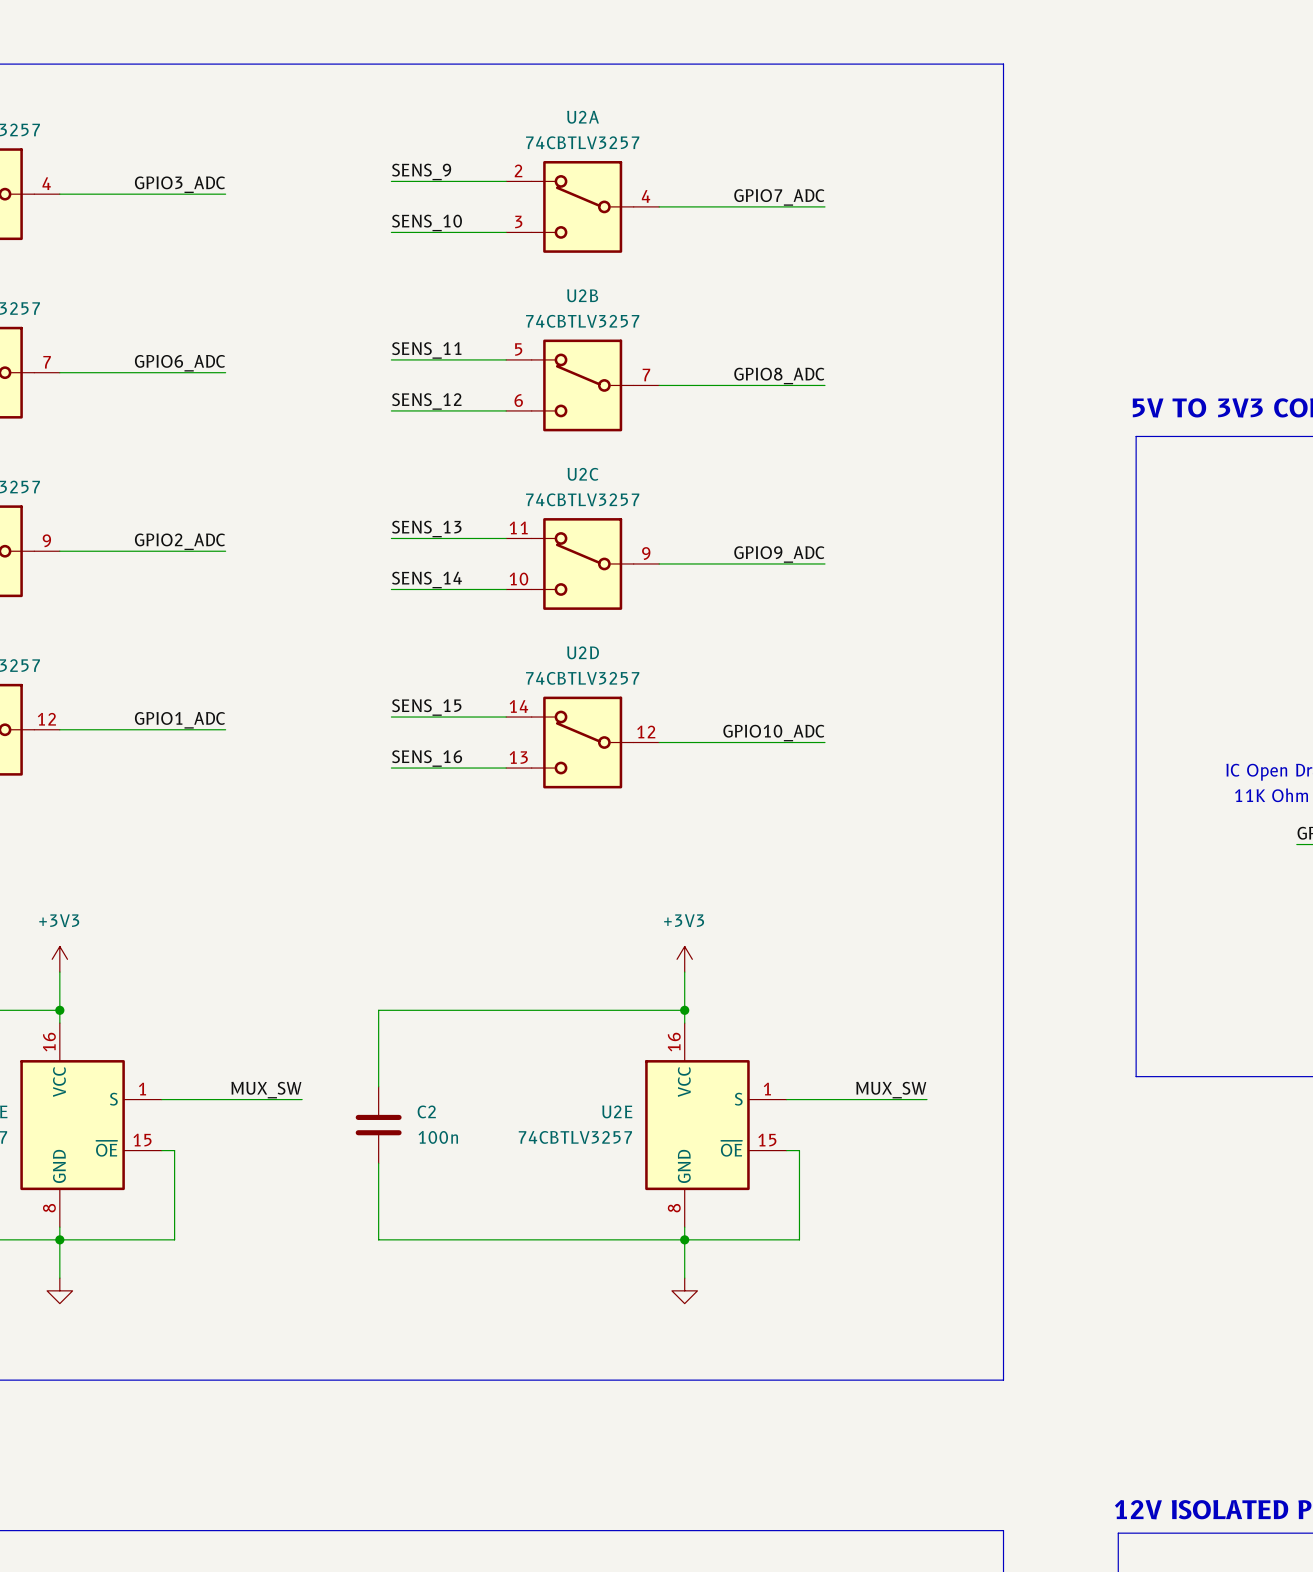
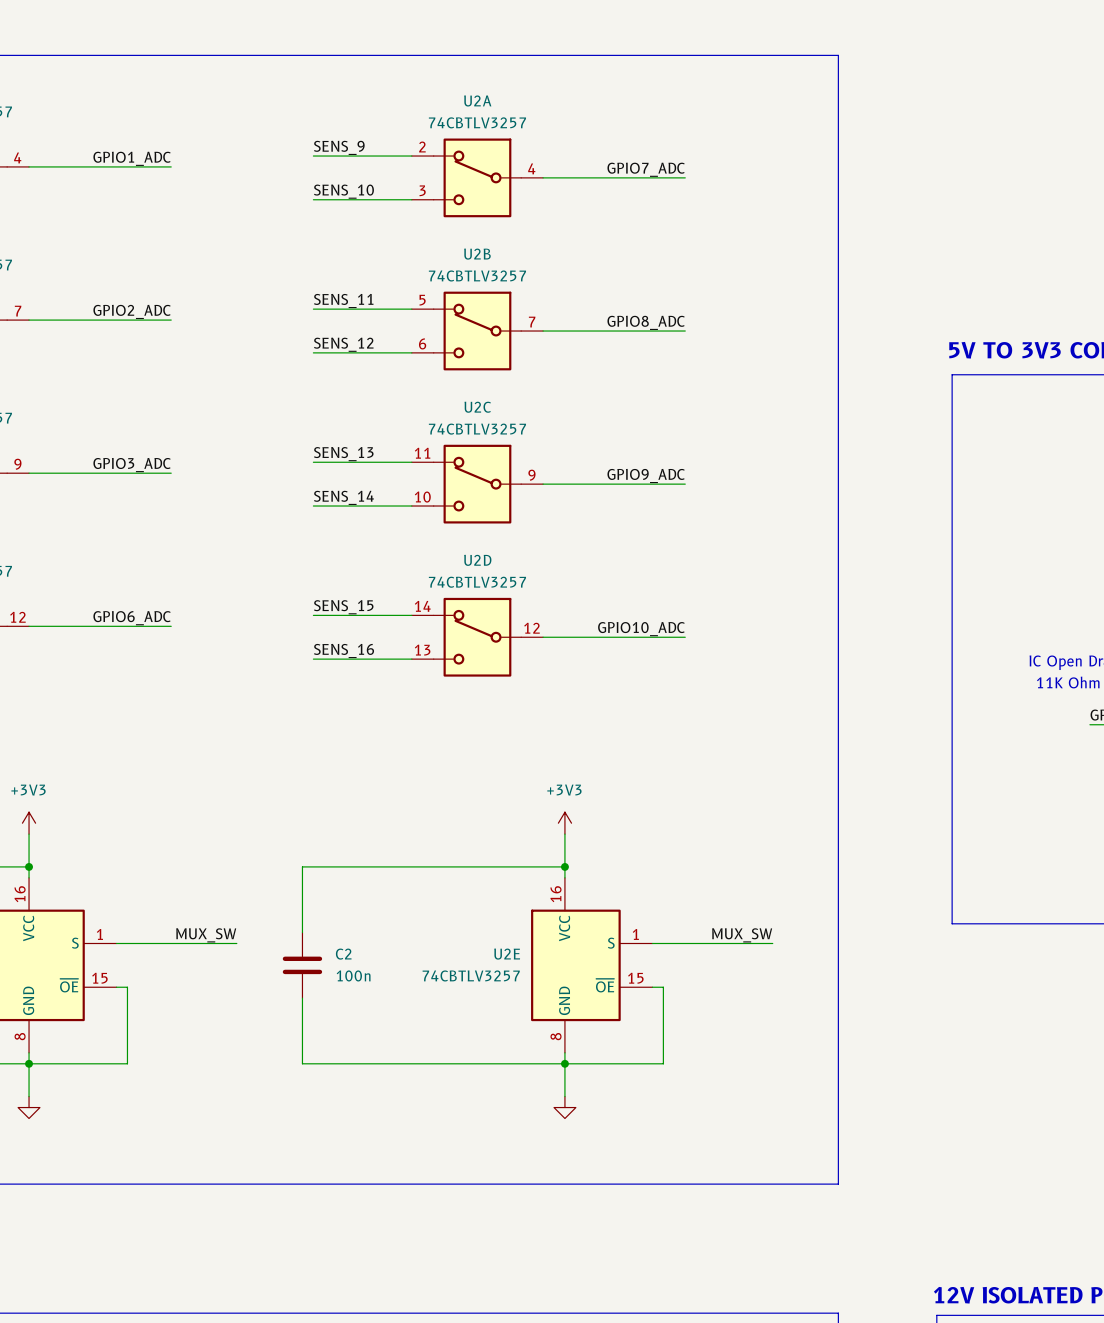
label: GPIO3_ADC (179, 184) -> GPIO1_ADC (132, 158)
label: GPIO6_ADC (179, 363) -> GPIO2_ADC (132, 311)
label: GPIO2_ADC (179, 541) -> GPIO3_ADC (132, 465)
label: GPIO1_ADC (179, 720) -> GPIO6_ADC (132, 618)

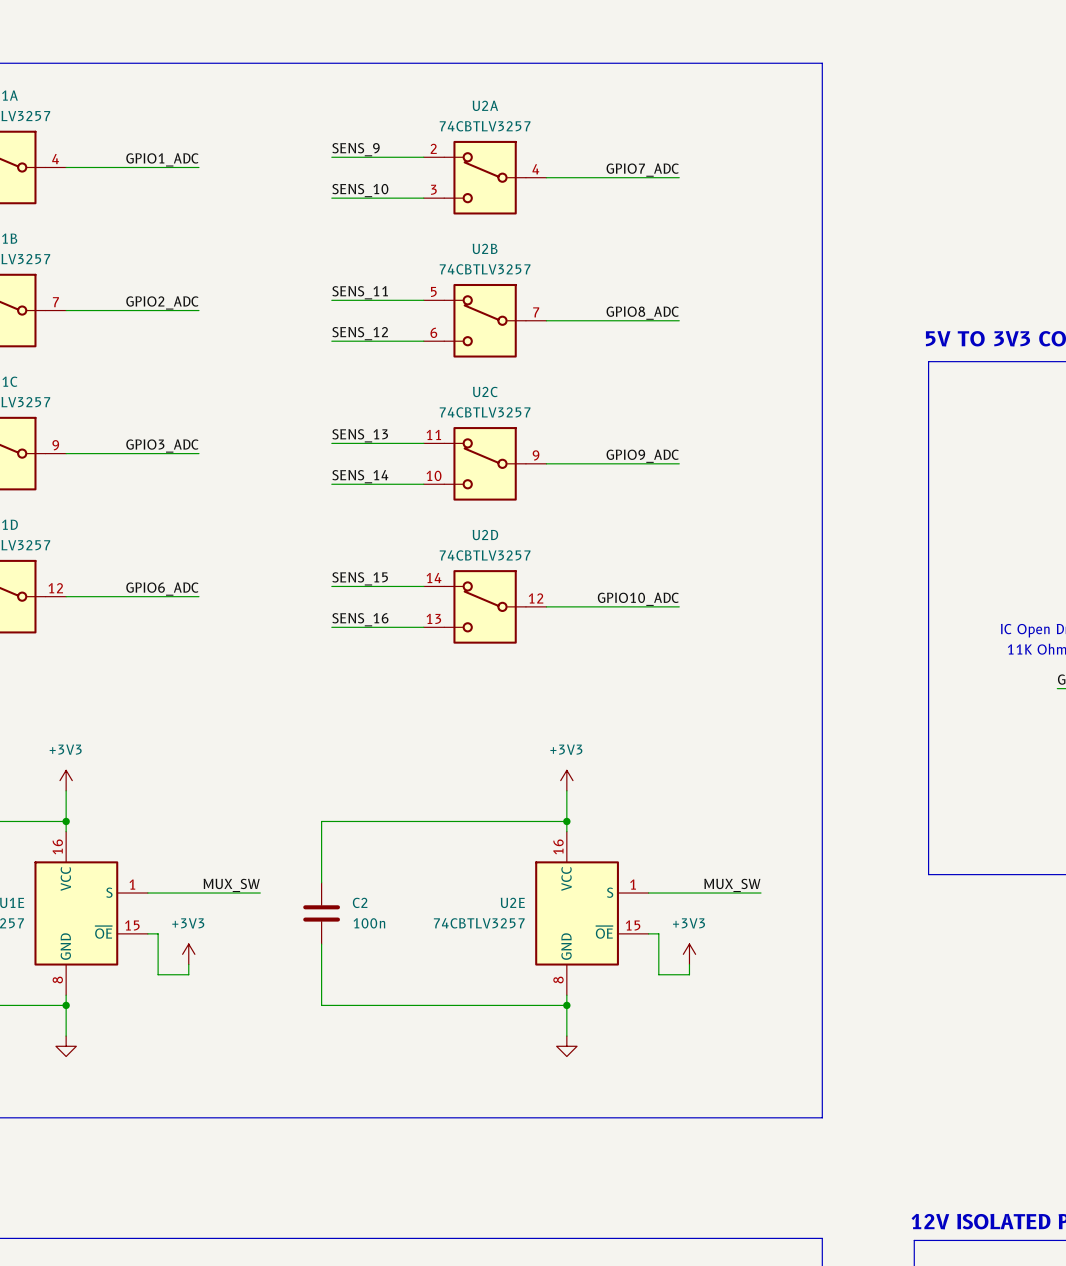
power symbol: none -> +3V3 (188, 954)
power symbol: none -> +3V3 (689, 954)
wire: (127, 1030) (127, 1063) (29, 1063) -> (158, 974) (188, 974) (188, 964)
wire: (663, 1030) (663, 1063) (564, 1063) -> (658, 974) (689, 974) (689, 964)

